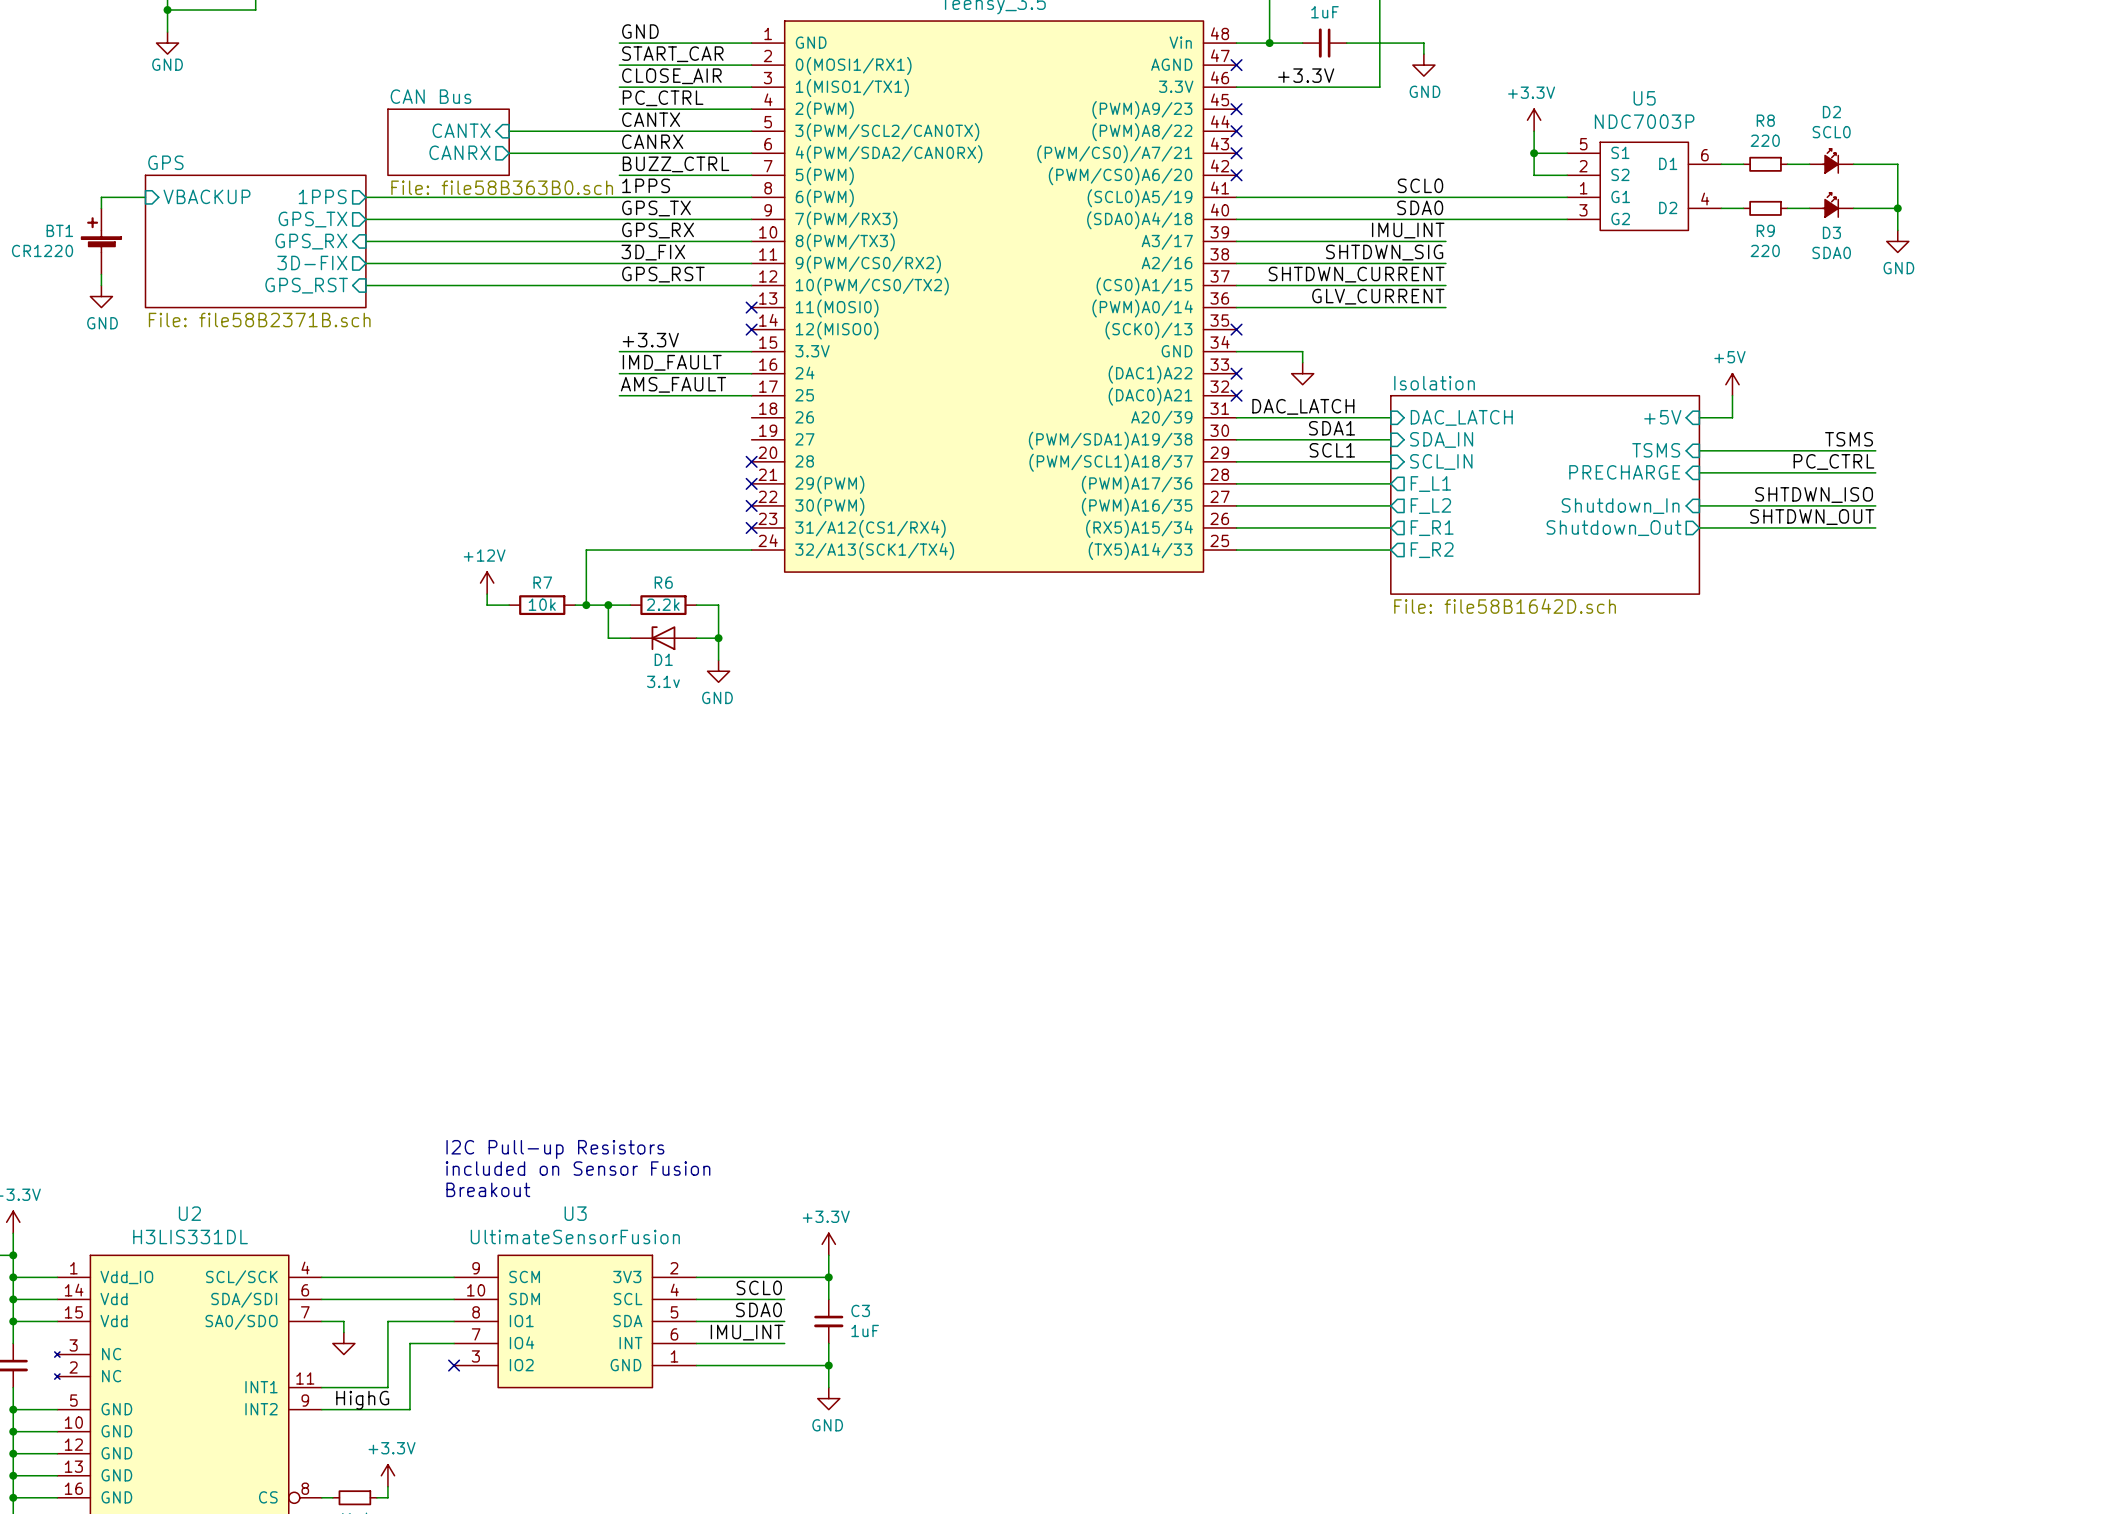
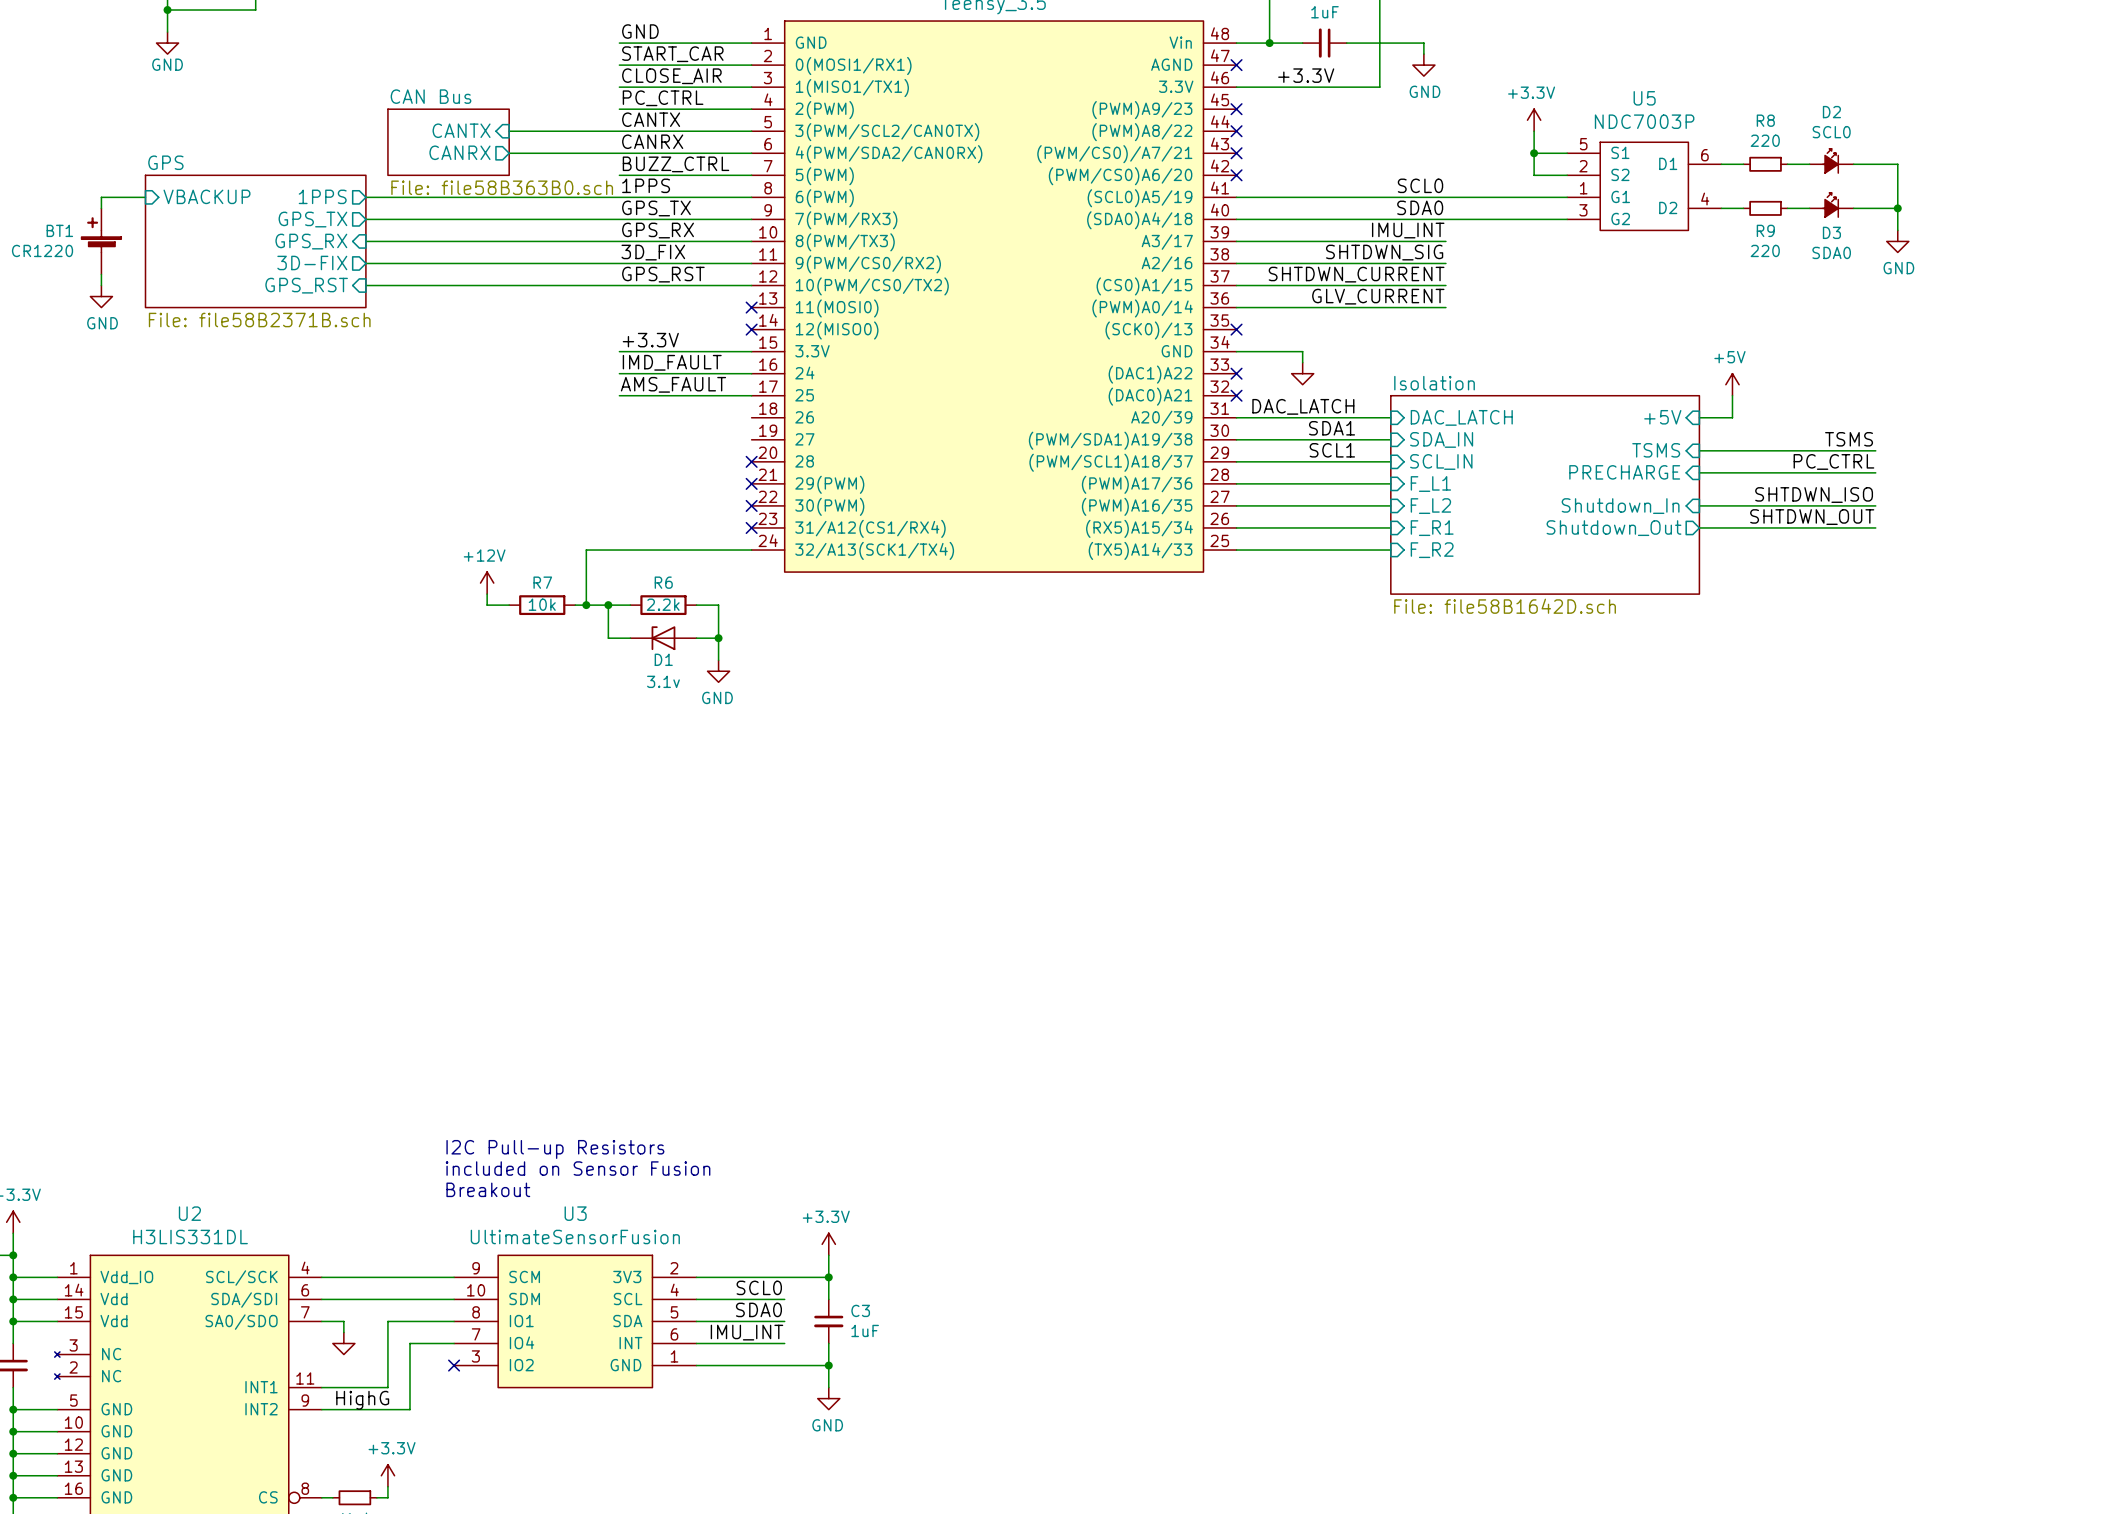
sheet pin shape: output (1430, 484) -> input (1430, 484)
sheet pin shape: output (1430, 506) -> input (1430, 506)
sheet pin shape: output (1432, 528) -> input (1432, 528)
sheet pin shape: output (1432, 550) -> input (1432, 550)

